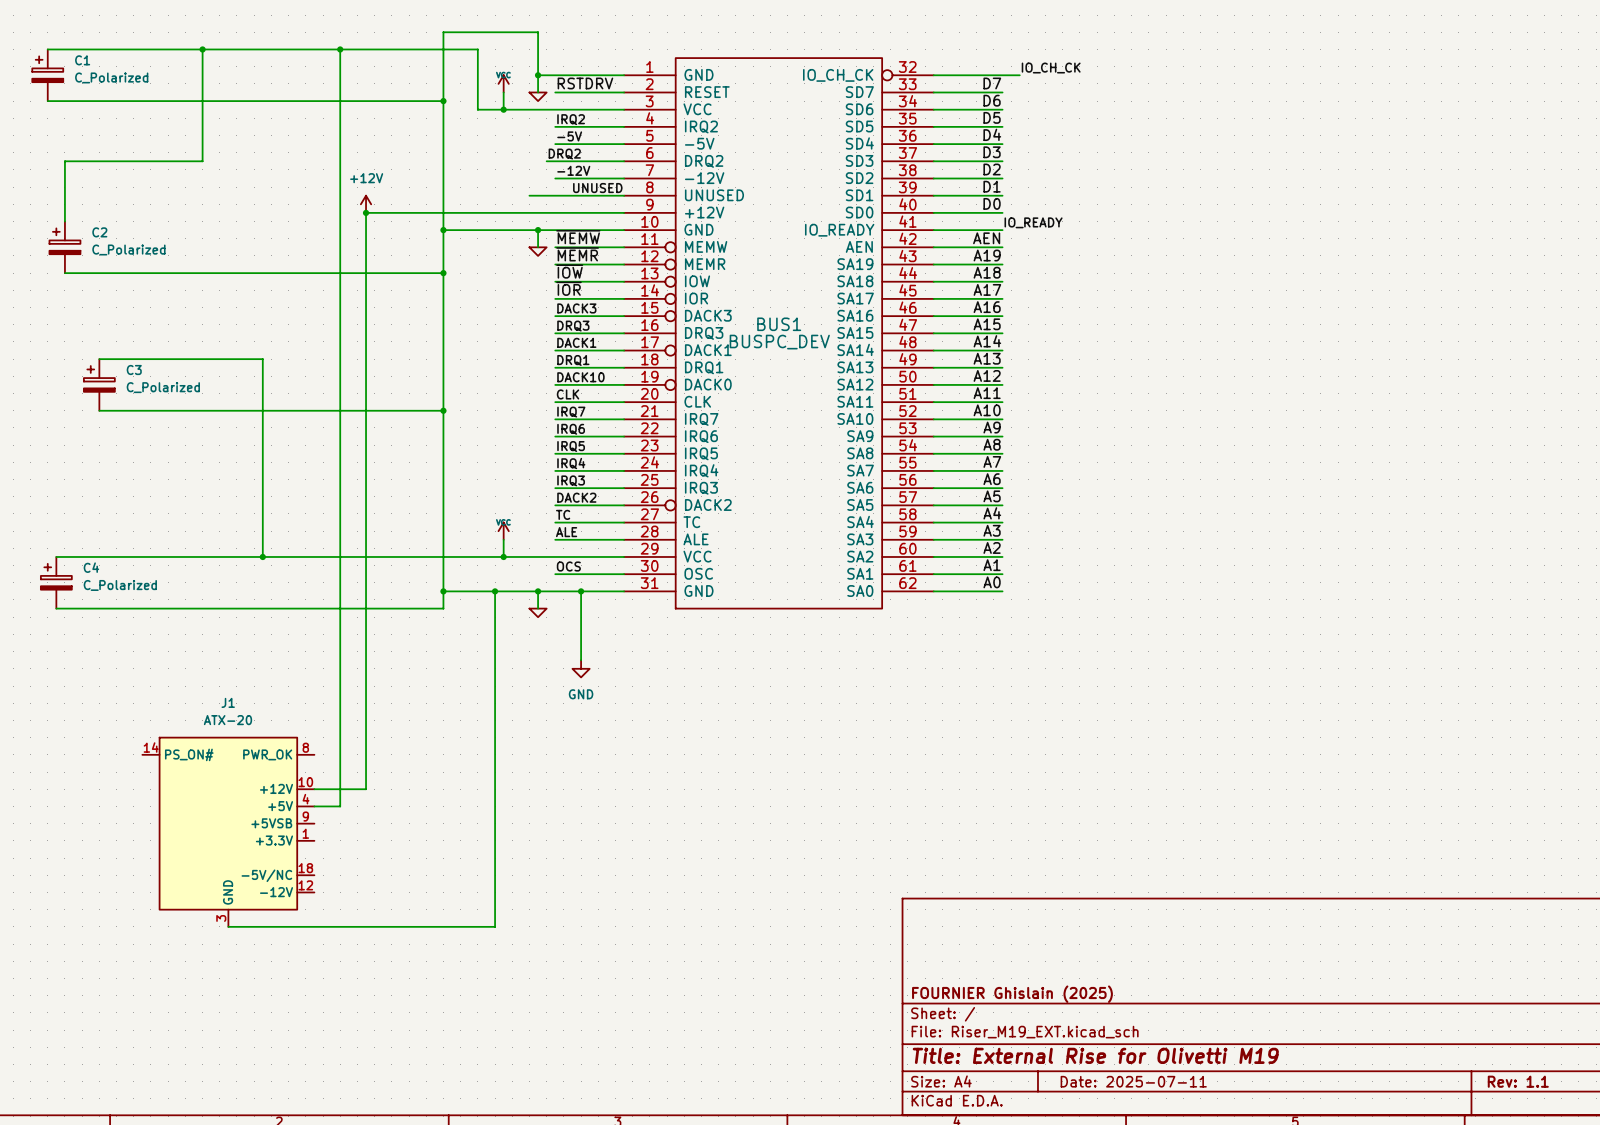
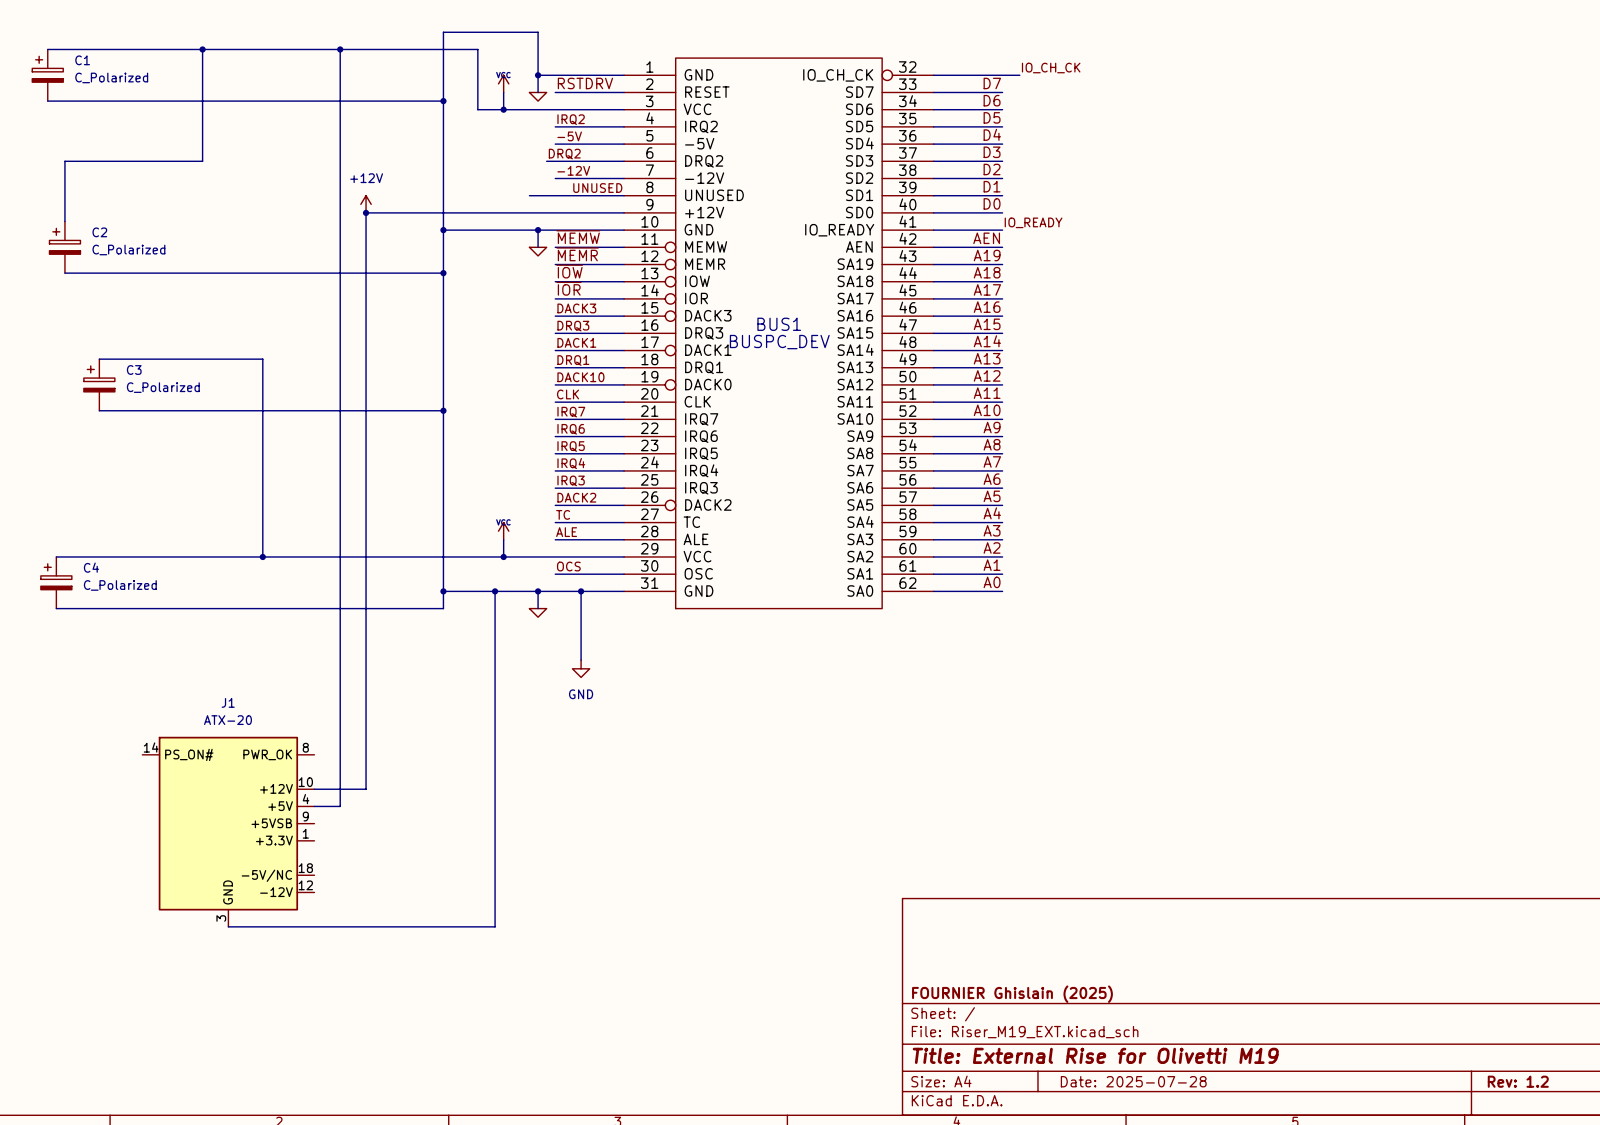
title block: Date: 2025-07-11 (1133, 1081) -> Date: 2025-07-28 (1133, 1081)
title block: Rev: 1.1 (1518, 1081) -> Rev: 1.2 (1518, 1081)

